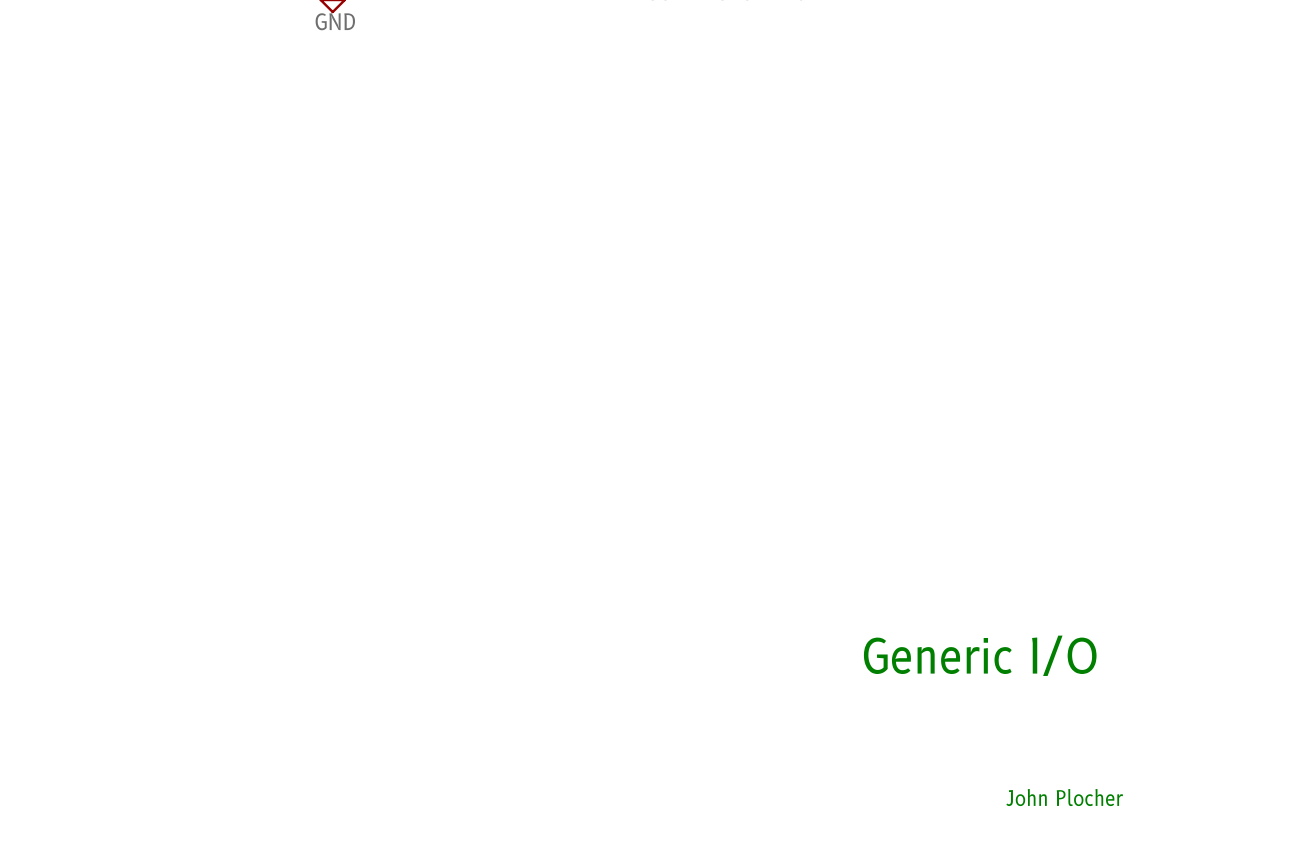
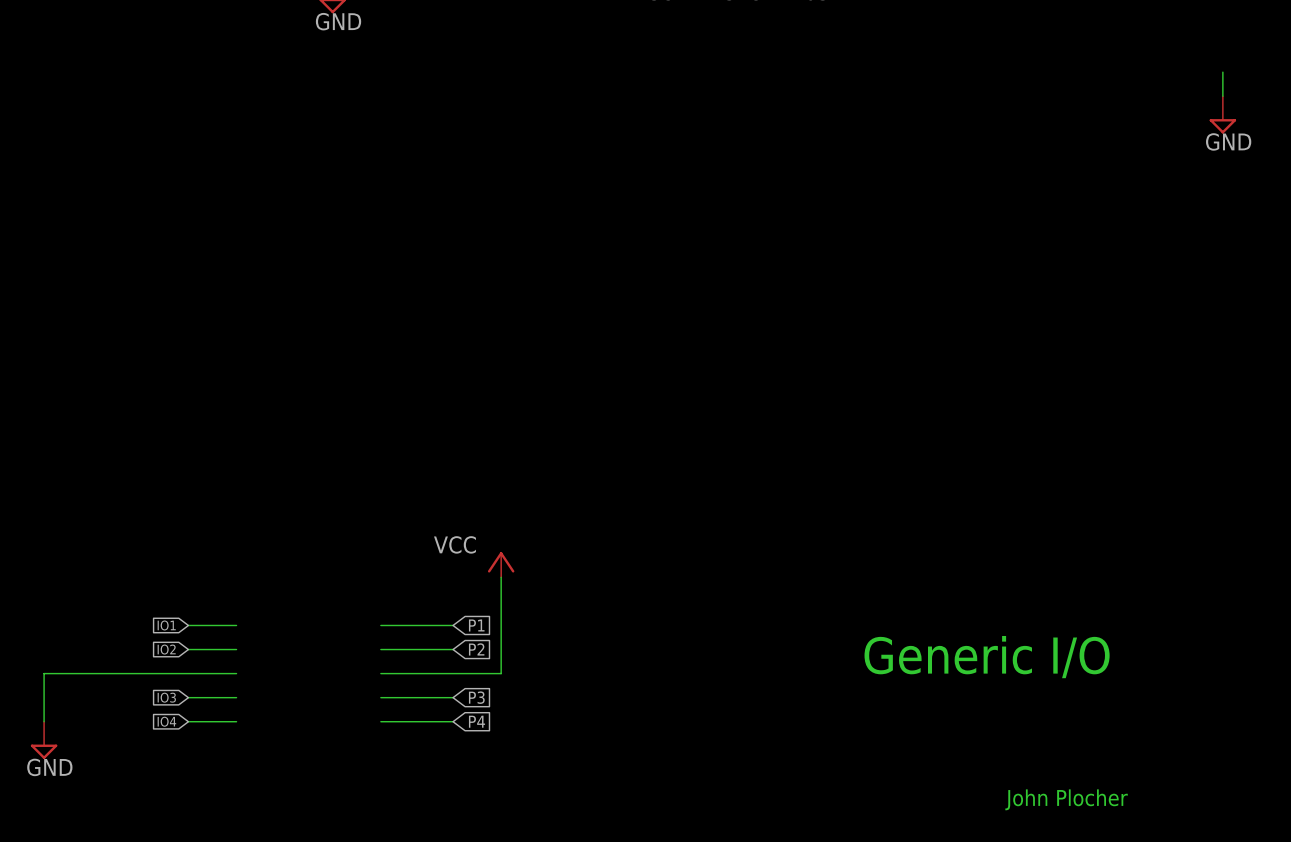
wire: none -> (1222, 72) (1222, 96)
power symbol: none -> GND (1222, 114)
power symbol: none -> VCC (501, 564)
wire: none -> (501, 577) (501, 673) (380, 673)
global label: none -> IO1 (166, 625)
wire: none -> (188, 625) (236, 625)
wire: none -> (380, 625) (453, 625)
global label: none -> P1 (476, 625)
global label: none -> IO2 (166, 649)
wire: none -> (188, 649) (236, 649)
wire: none -> (380, 649) (453, 649)
global label: none -> P2 (476, 649)
wire: none -> (236, 673) (44, 673) (44, 721)
global label: none -> IO3 (166, 697)
wire: none -> (188, 697) (236, 697)
wire: none -> (380, 697) (453, 697)
global label: none -> P3 (476, 697)
global label: none -> IO4 (166, 721)
wire: none -> (188, 721) (236, 721)
wire: none -> (380, 721) (453, 721)
global label: none -> P4 (476, 721)
power symbol: none -> GND (44, 740)

